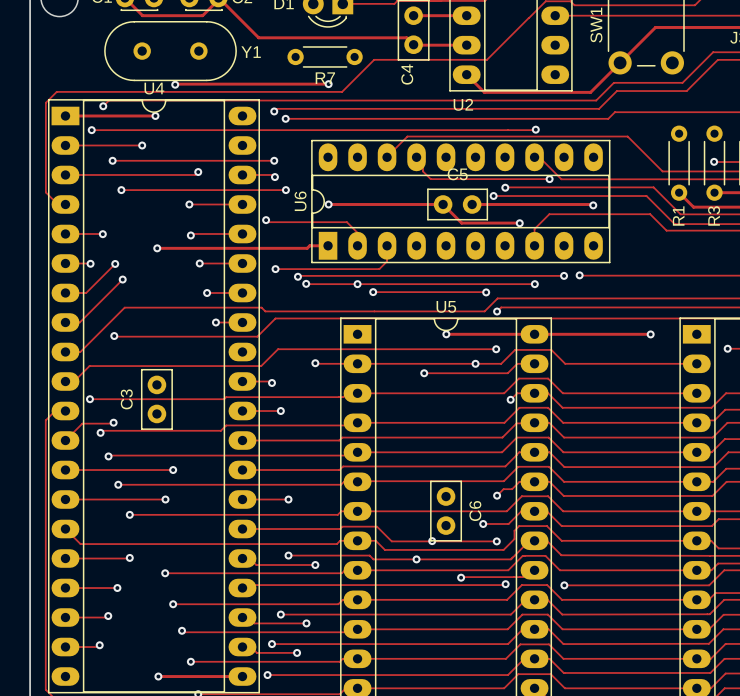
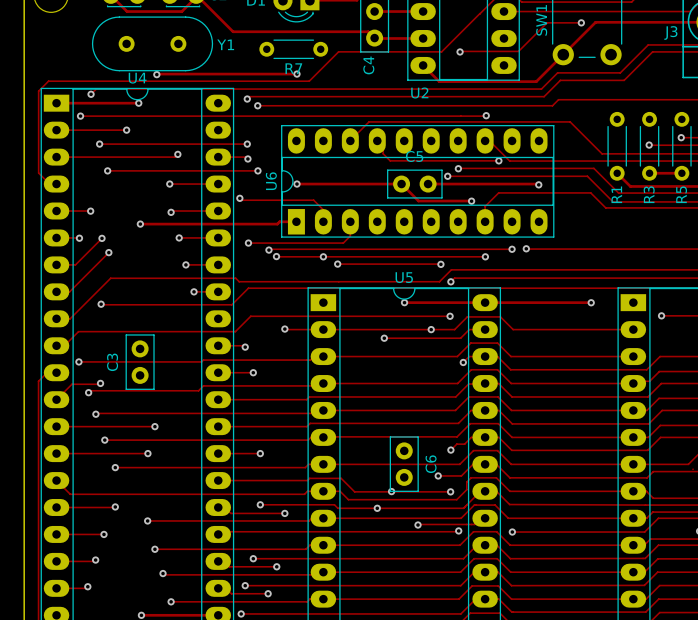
track: none -> (581, 22) (547, 22) (518, 51) (460, 51)
via: none -> (581, 22)
via: none -> (460, 51)

